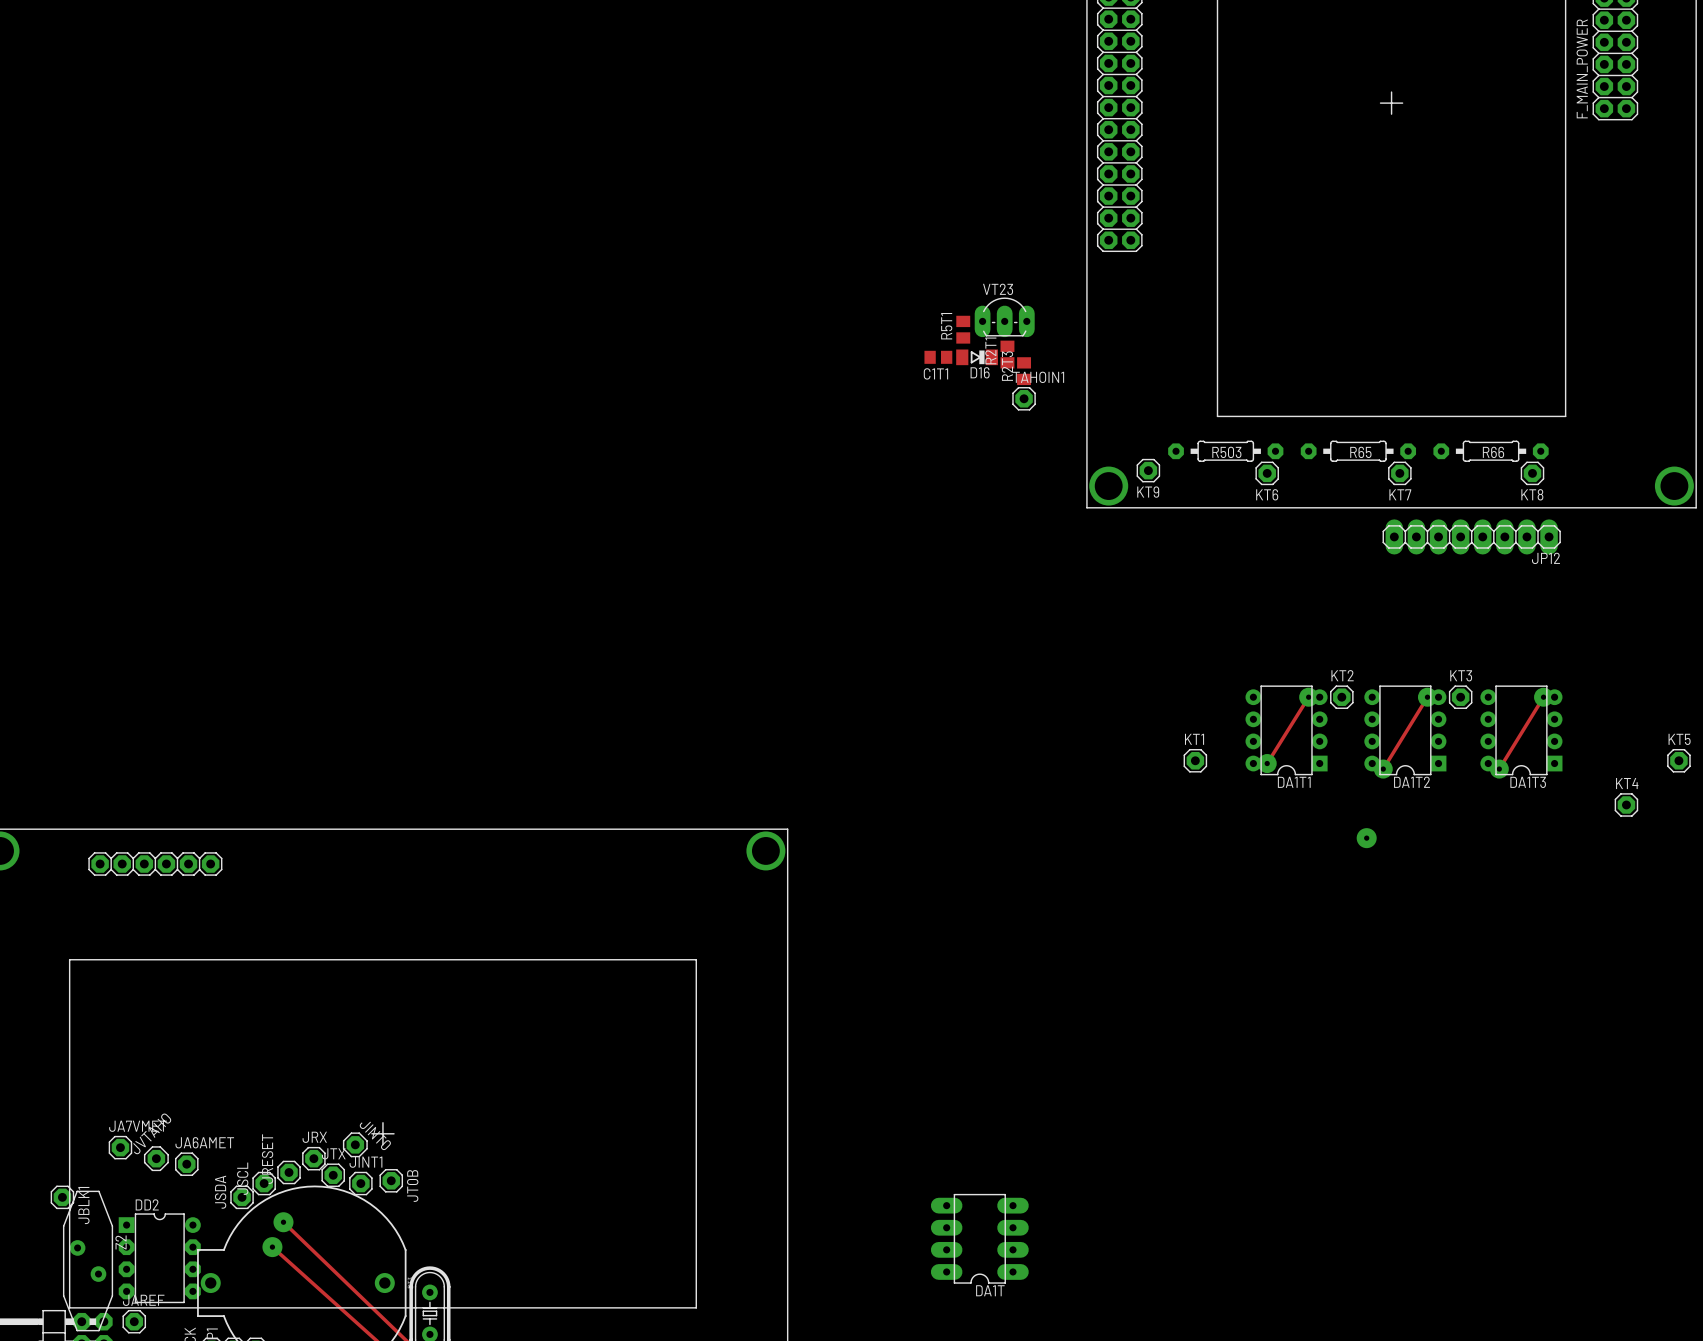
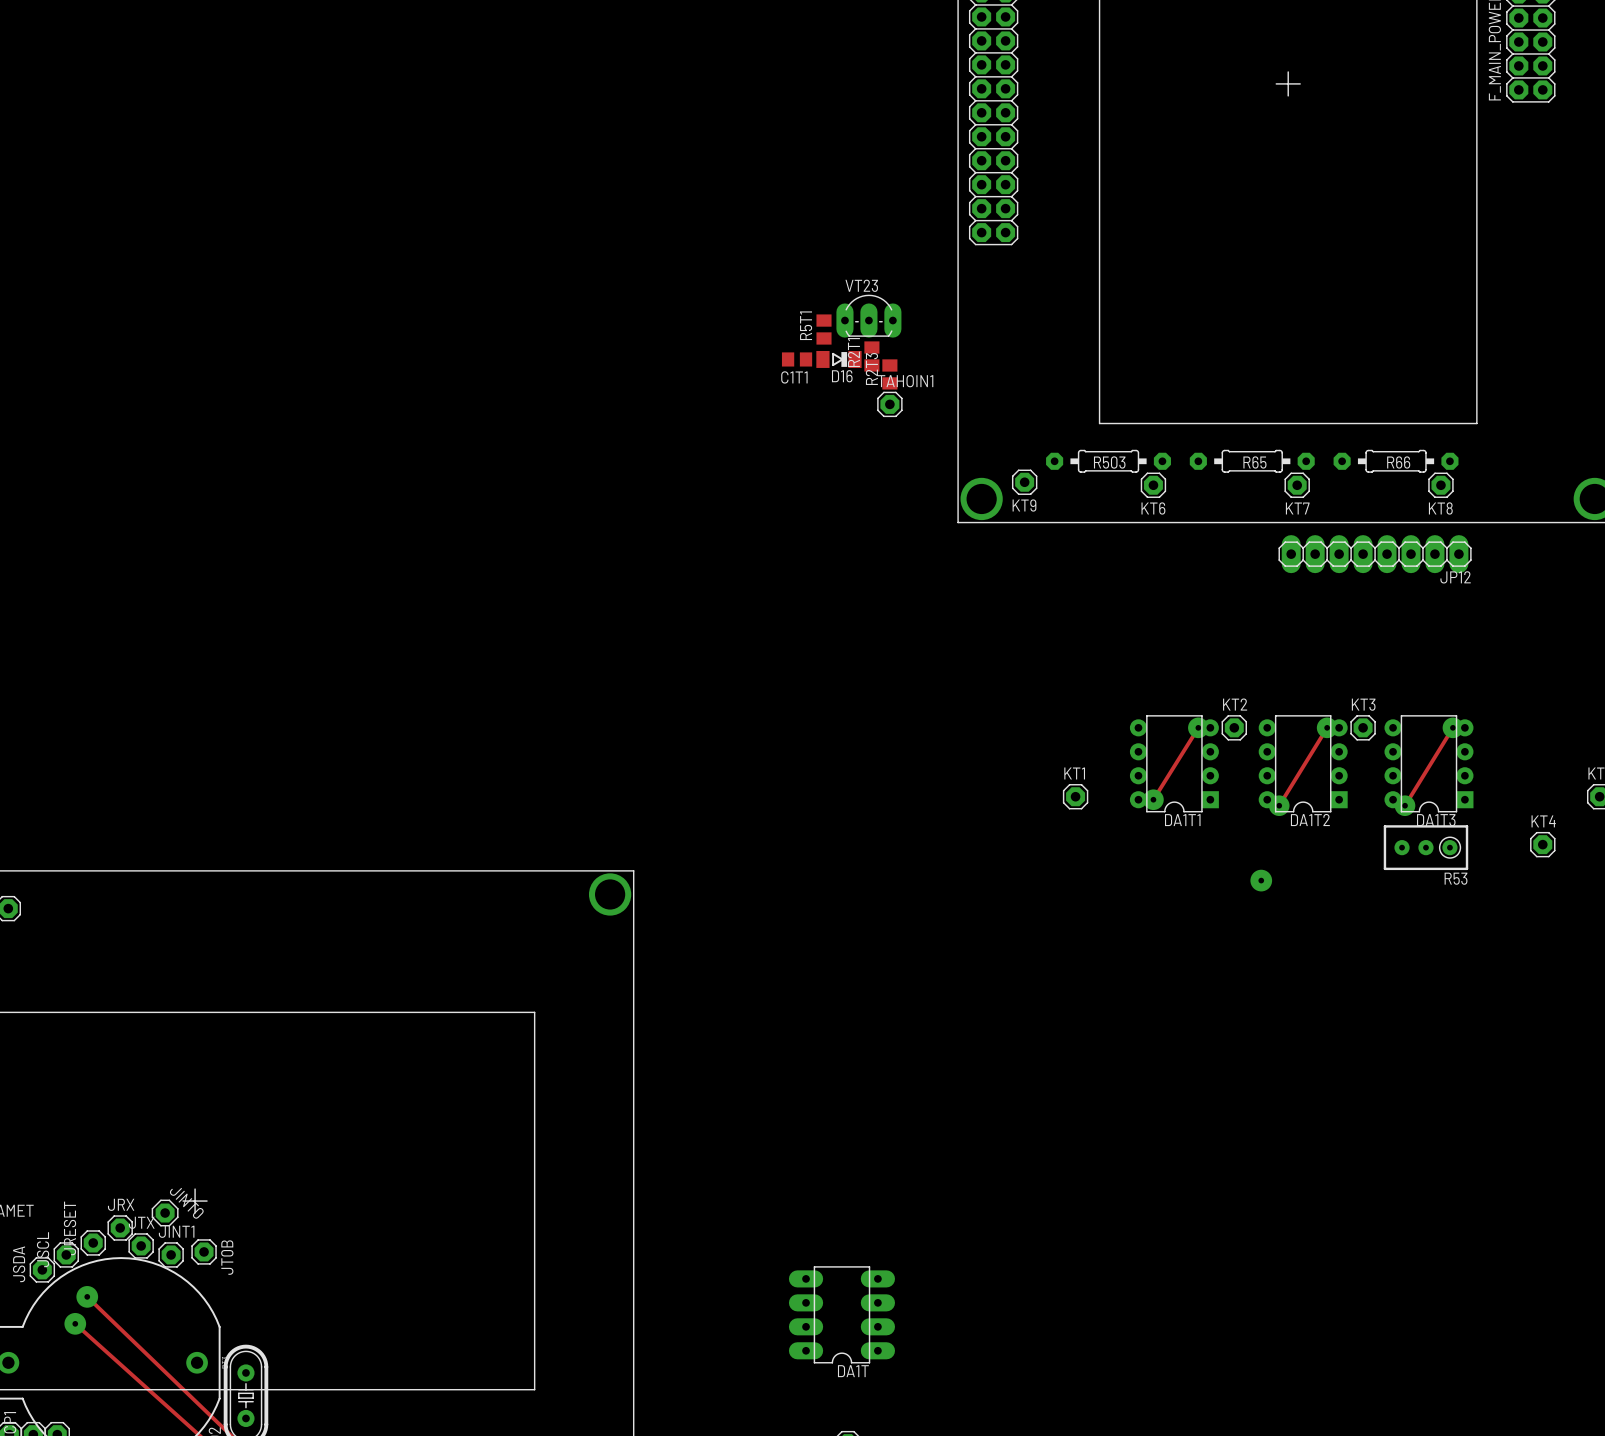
R53: none -> (1425, 847)

